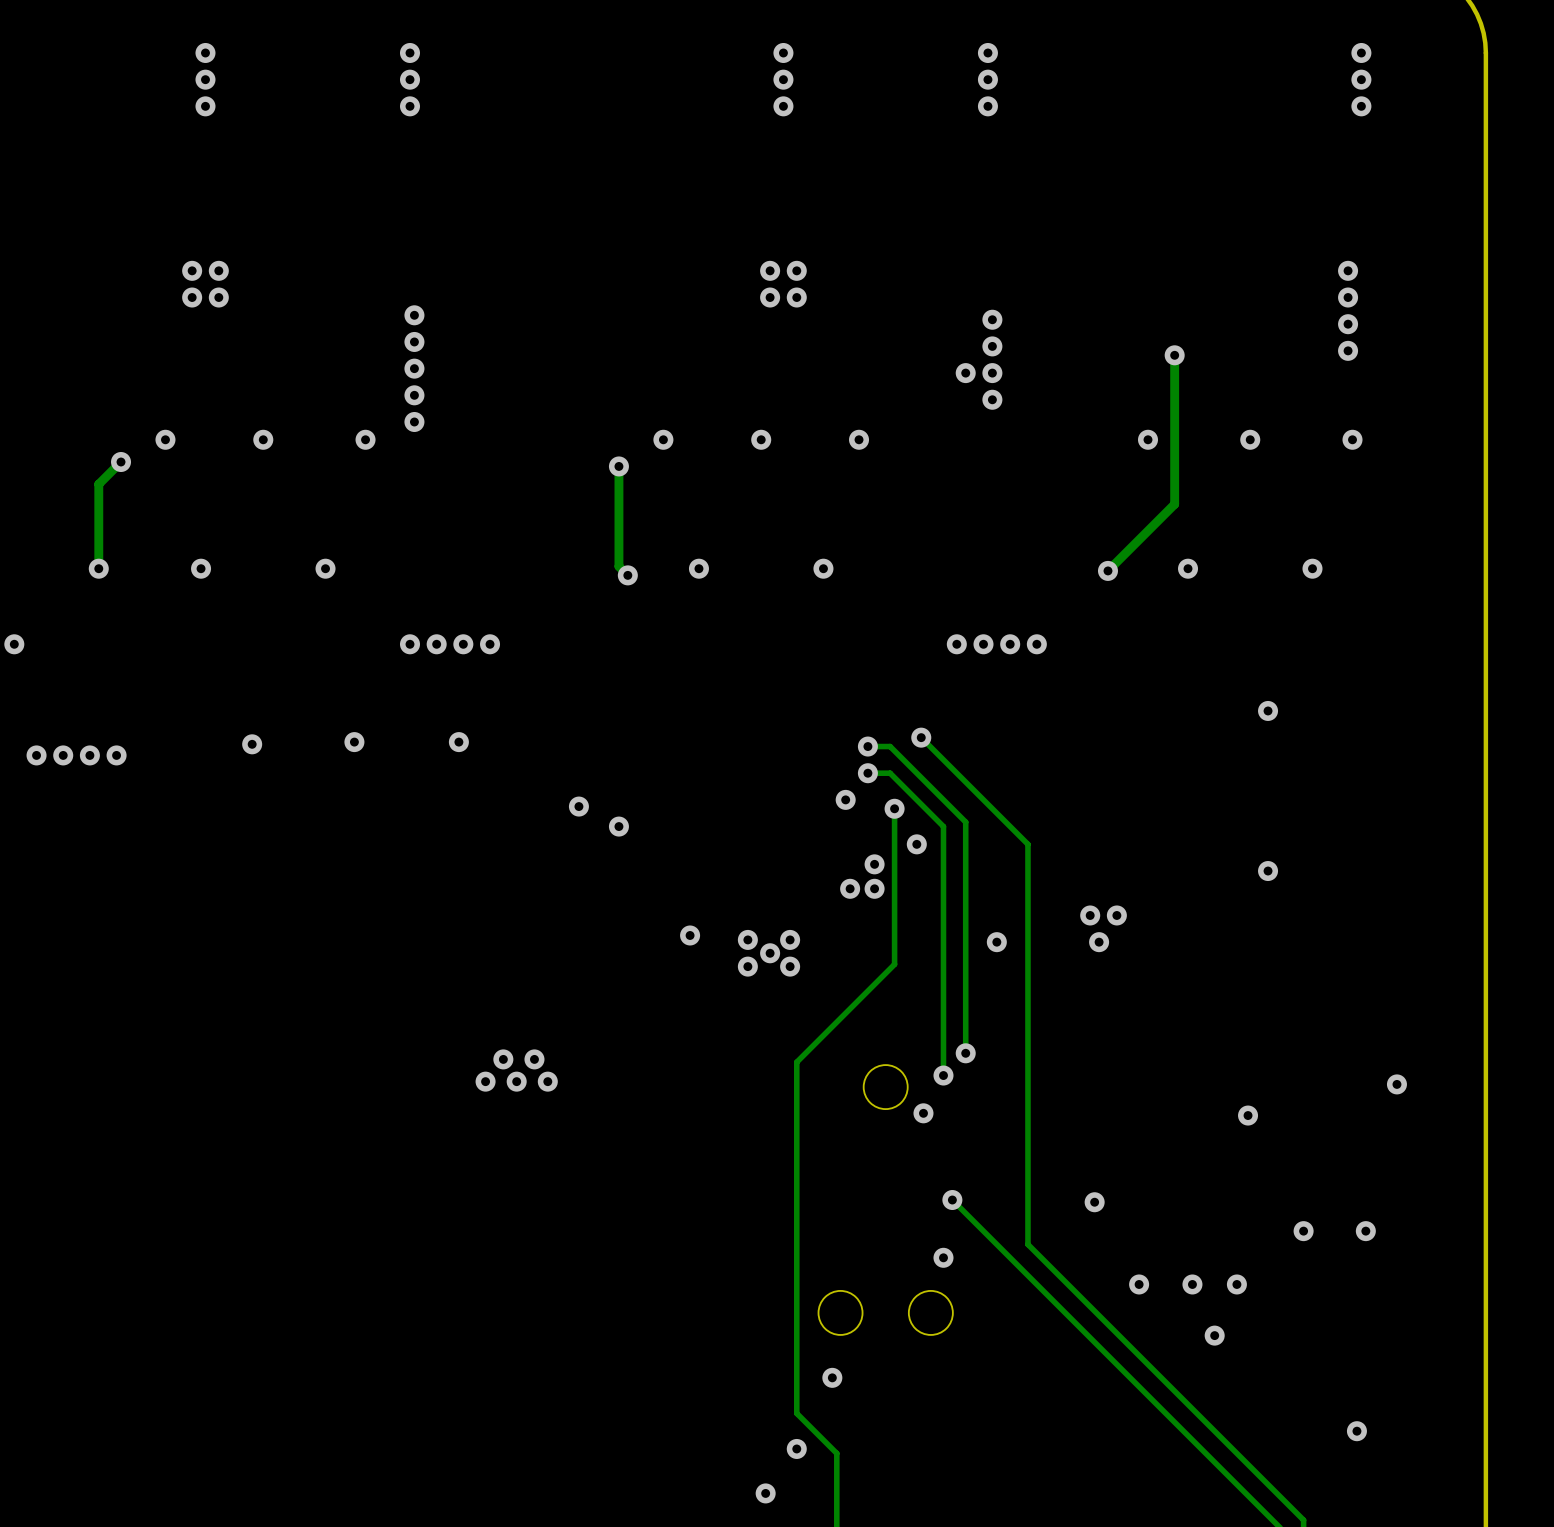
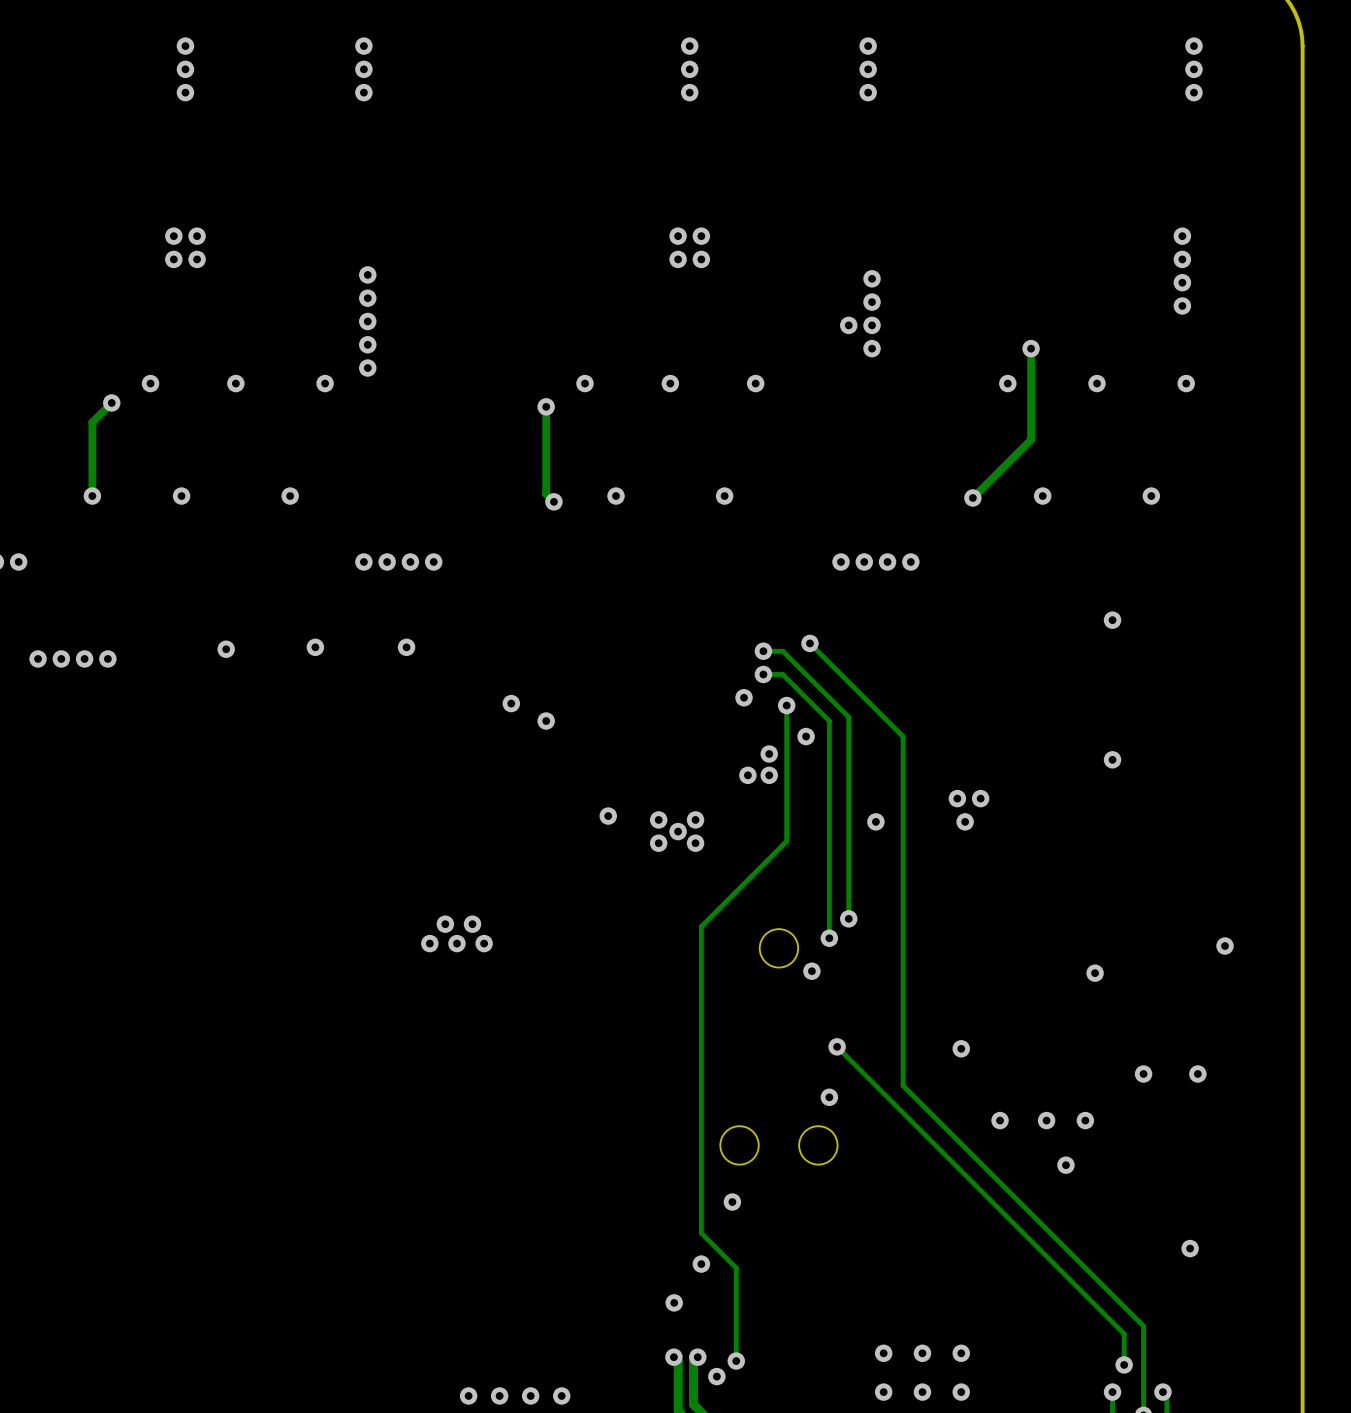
track: (1174, 355) (1174, 399) -> none
via position: (1174, 355) -> (1031, 348)

